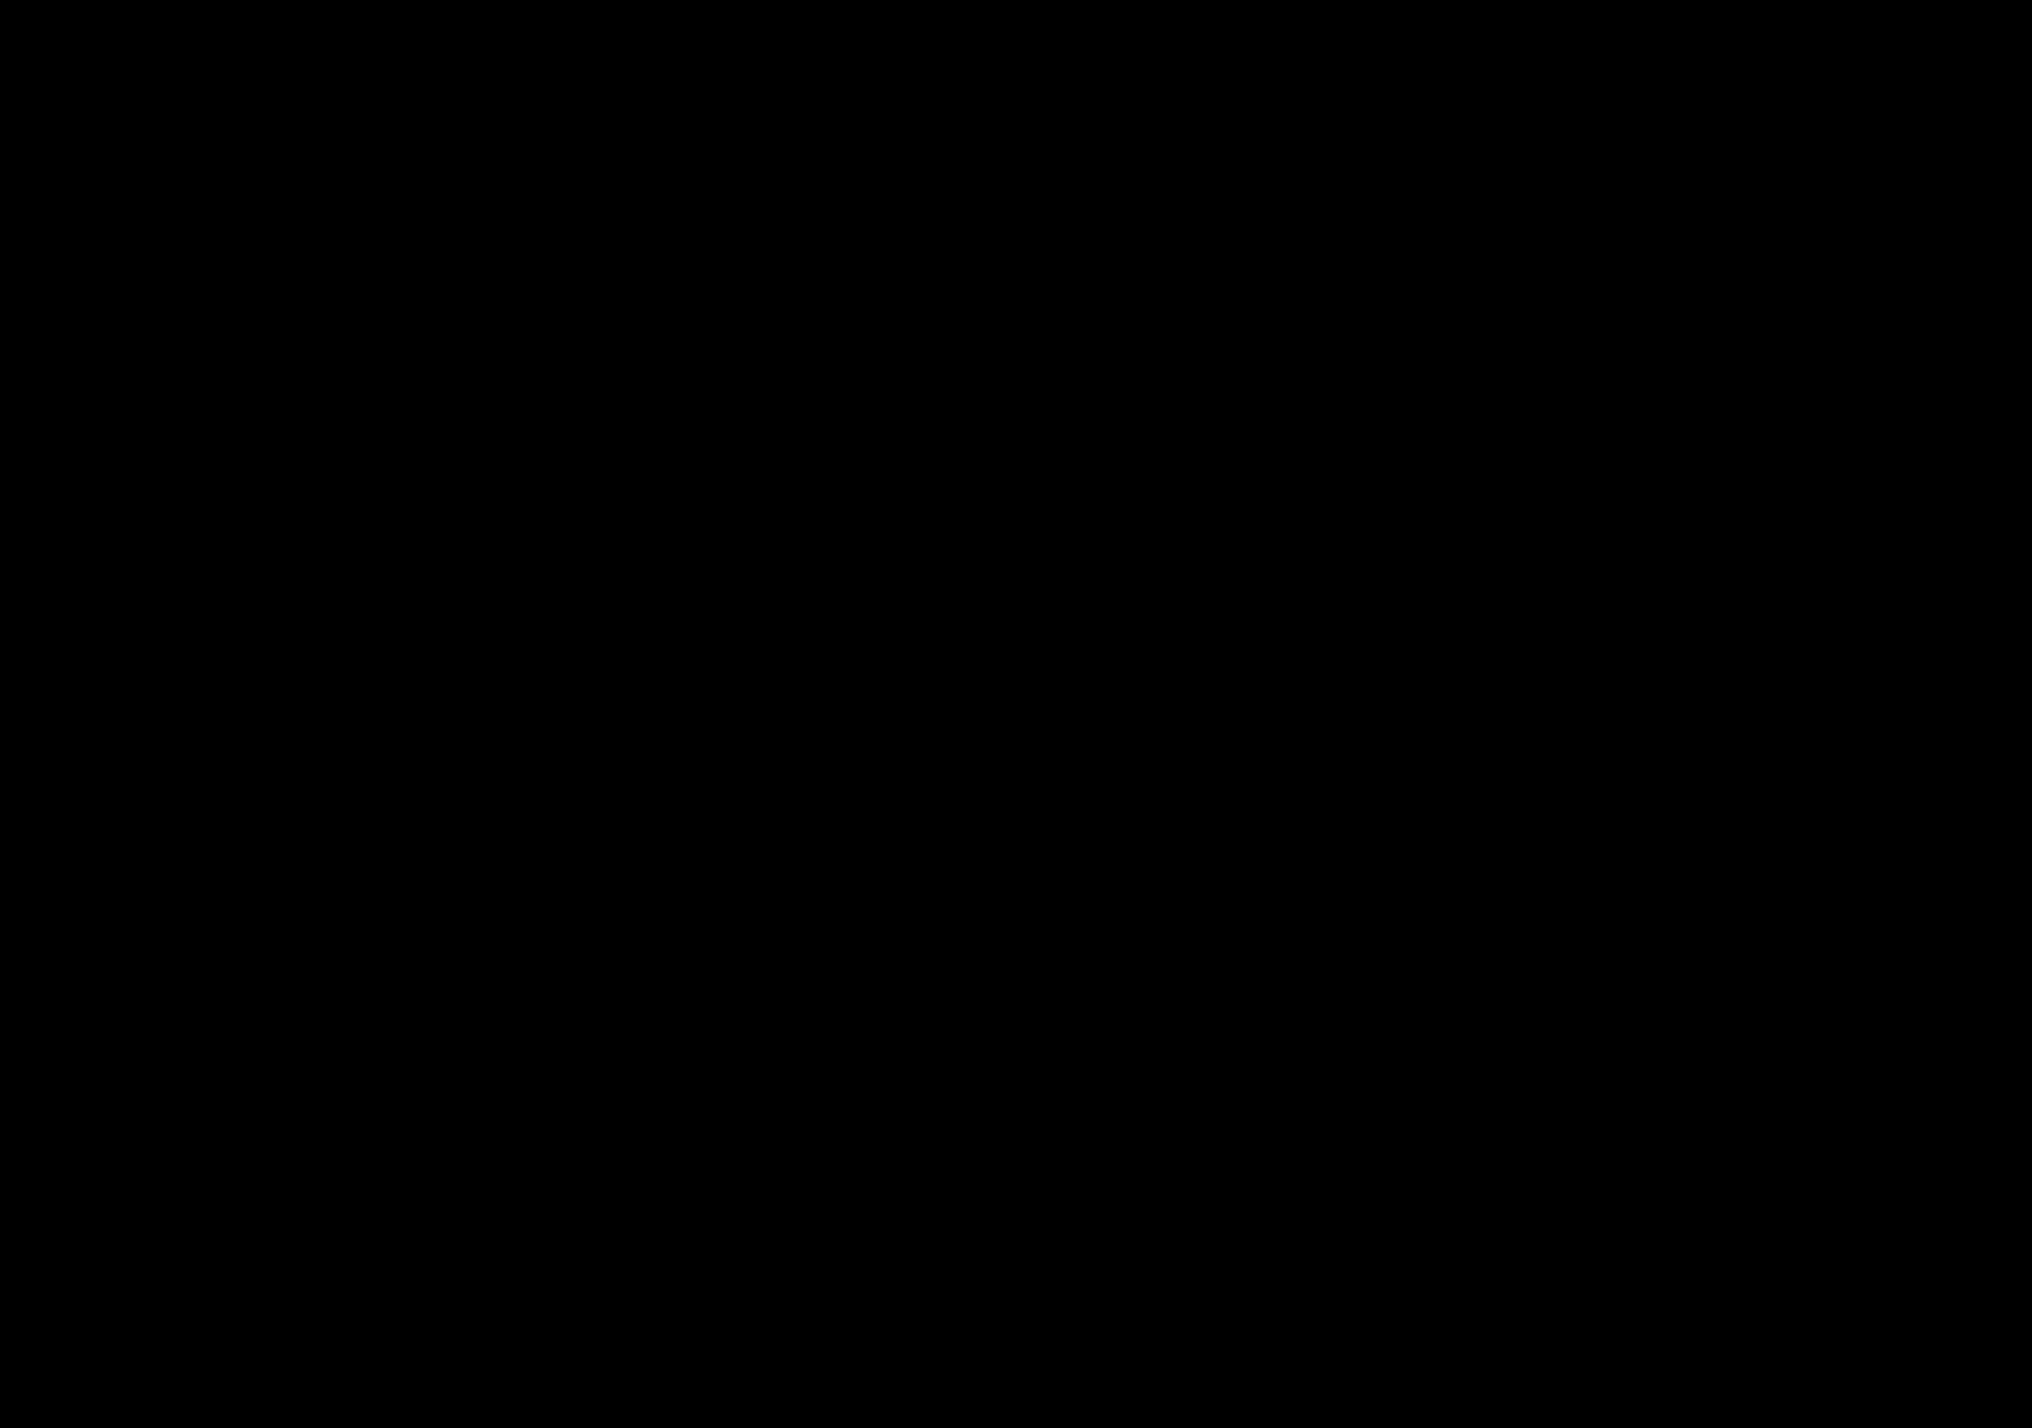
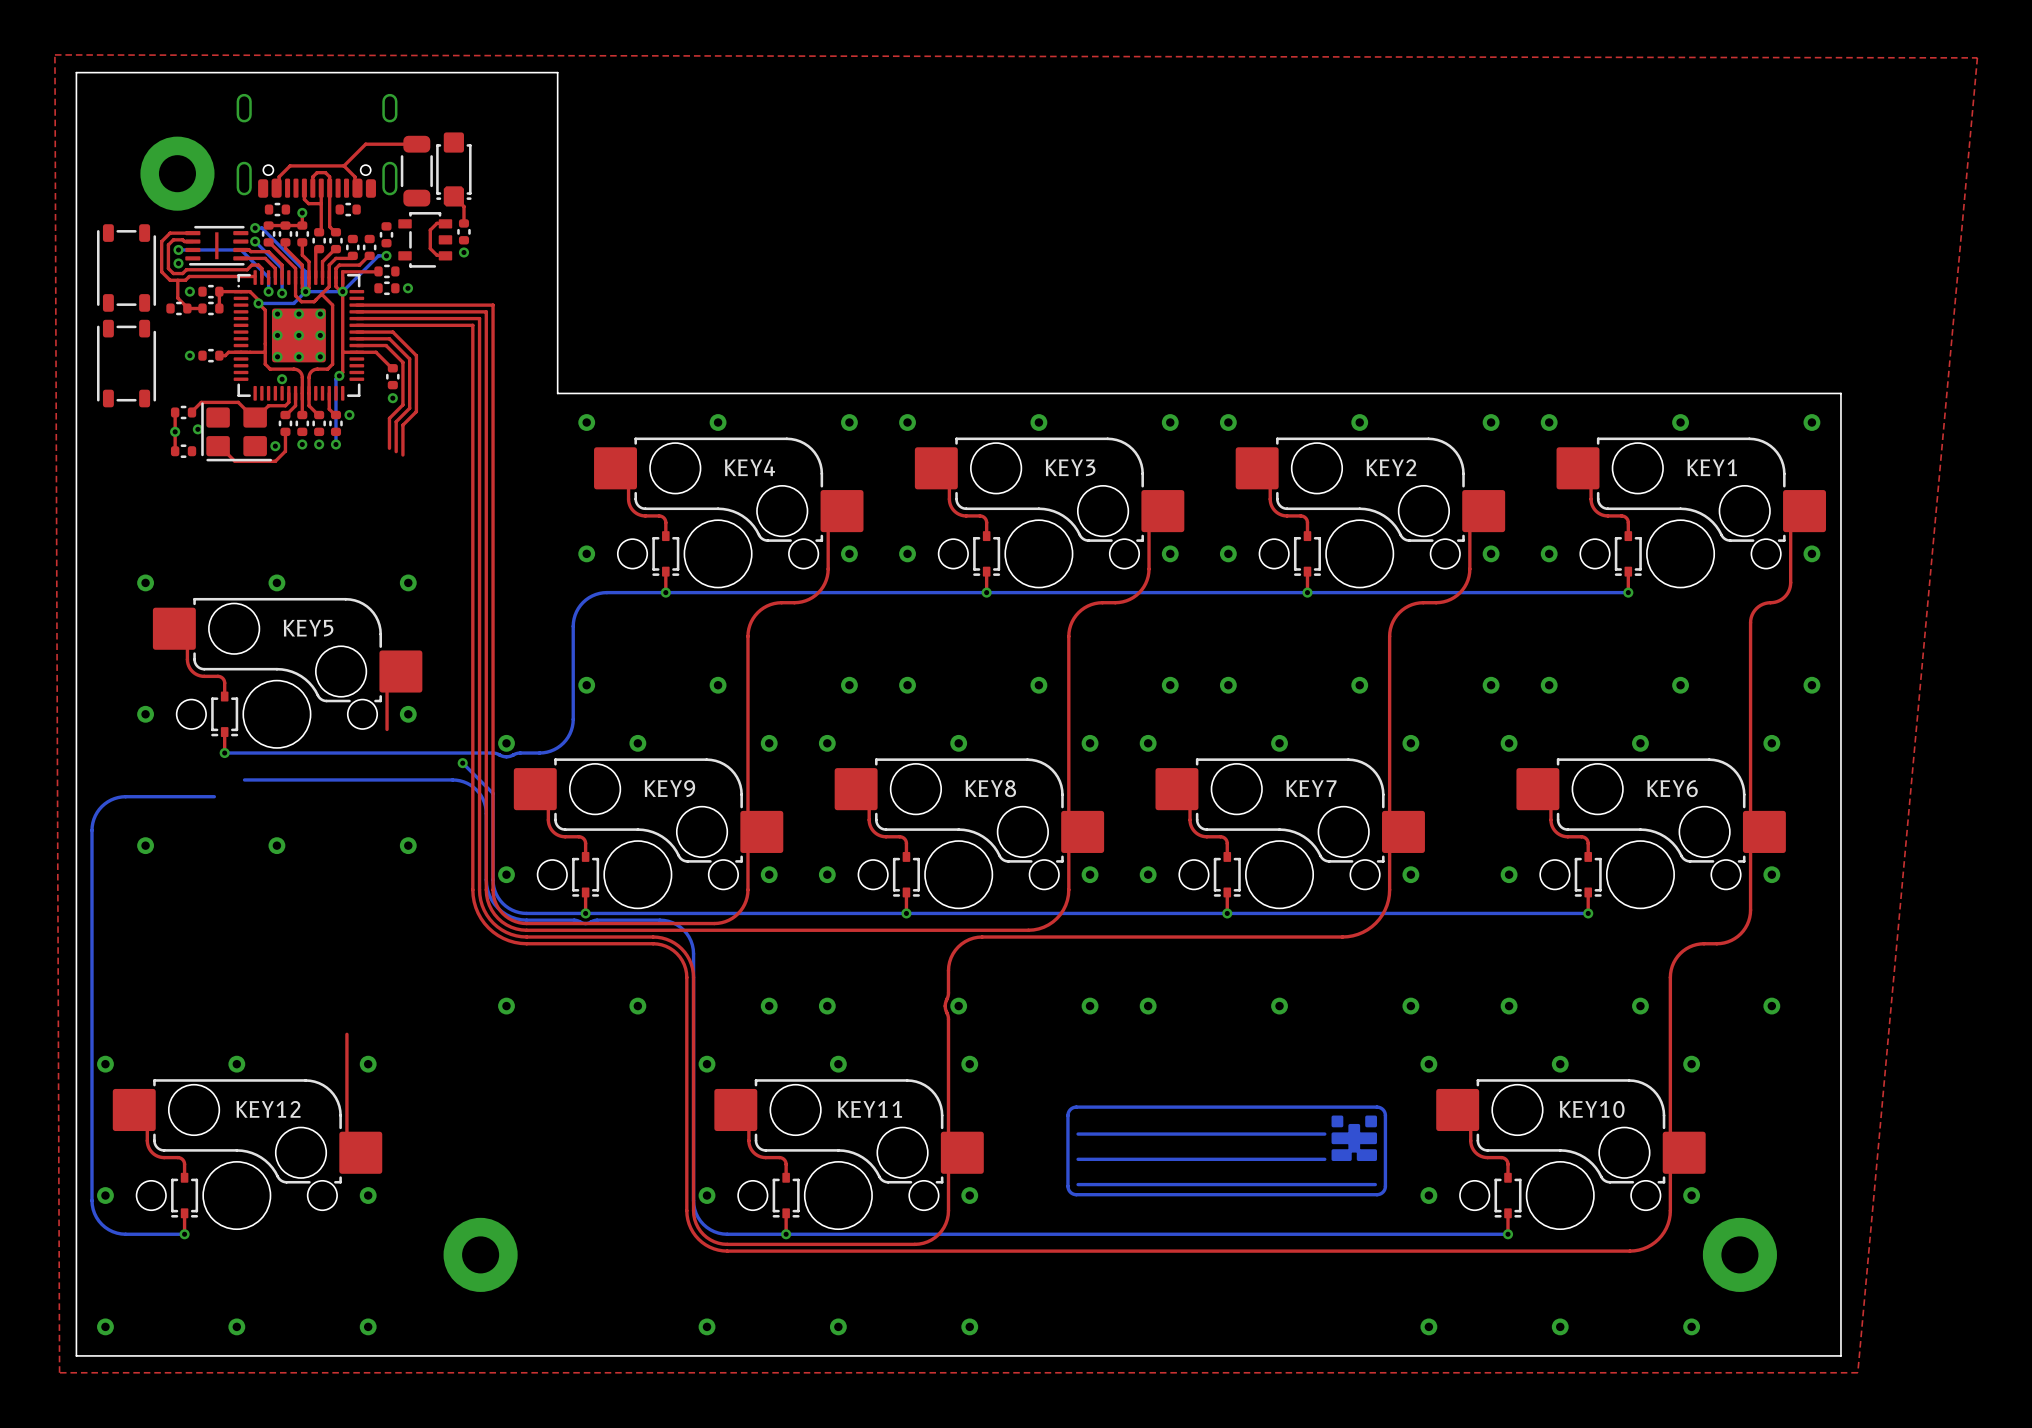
top zone outline: none -> (54, 54) (1977, 57) (1857, 1372) (59, 1372) (54, 54)
board edge: none -> (76, 72) (557, 72) (557, 393) (1840, 393) (1840, 1355) (76, 1355) (76, 72)
top track: none -> (416, 144) (365, 144) (343, 165)
part: none -> (317, 145)
top track: none -> (343, 165) (290, 165) (279, 176) (279, 188)
top track: none -> (343, 165) (354, 176) (354, 188)
part: none -> (453, 169)
part: none -> (416, 171)
part: none -> (177, 173)
top track: none -> (304, 188) (304, 199) (308, 203) (321, 203)
top track: none -> (312, 188) (312, 176) (317, 172) (325, 172) (329, 176) (329, 226) (335, 232)
top track: none -> (321, 188) (321, 232)
top track: none -> (453, 196) (463, 206) (463, 223)
part: none -> (277, 209)
part: none -> (348, 209)
top track: none -> (302, 212) (302, 225) (268, 225)
via: none -> (302, 212)
top track: none -> (445, 223) (437, 223) (430, 230) (430, 248) (437, 255) (445, 255)
bottom track: none -> (255, 228) (261, 228) (305, 271) (305, 291)
via: none -> (255, 228)
part: none -> (463, 231)
top track: none -> (191, 233) (170, 233) (161, 241) (161, 271) (170, 280) (185, 280) (189, 276) (255, 276)
part: none -> (268, 233)
part: none -> (285, 233)
part: none -> (302, 233)
part: none -> (386, 234)
part: none -> (425, 239)
part: none -> (319, 240)
part: none -> (335, 240)
top track: none -> (192, 241) (173, 239) (168, 244) (168, 268) (173, 273) (182, 273) (186, 269) (247, 269) (251, 265) (258, 265) (261, 268) (261, 277)
bottom track: none -> (255, 241) (282, 268) (282, 293)
via: none -> (255, 241)
top track: none -> (269, 242) (295, 268) (295, 295) (301, 301) (314, 301) (329, 286) (329, 265) (335, 258) (352, 258)
top track: none -> (285, 242) (285, 248) (302, 265) (302, 288) (305, 291) (309, 288) (309, 261) (302, 255) (302, 242)
part: none -> (216, 245)
part: none -> (352, 247)
part: none -> (369, 247)
bottom track: none -> (178, 249) (241, 249) (268, 277) (268, 291)
via: none -> (178, 249)
top track: none -> (240, 249) (268, 251) (282, 265) (282, 277)
top track: none -> (315, 249) (315, 277)
top track: none -> (335, 249) (322, 261) (322, 277)
via: none -> (463, 252)
top track: none -> (368, 255) (359, 265) (339, 265) (335, 268) (335, 286) (341, 291)
bottom track: none -> (386, 255) (378, 255) (342, 291) (305, 291)
via: none -> (386, 255)
top track: none -> (240, 258) (265, 258) (275, 268) (275, 277)
via: none -> (178, 263)
part: none -> (126, 267)
top track: none -> (342, 271) (378, 271)
part: none -> (386, 271)
top track: none -> (342, 277) (342, 372) (339, 375)
top track: none -> (177, 280) (177, 298) (187, 307)
part: none -> (386, 288)
via: none -> (407, 288)
via: none -> (189, 291)
part: none -> (210, 291)
via: none -> (268, 291)
bottom track: none -> (305, 291) (293, 303) (258, 303)
via: none -> (305, 291)
via: none -> (342, 291)
via: none -> (282, 293)
top track: none -> (321, 294) (332, 305) (332, 364) (327, 369) (314, 369) (309, 375) (309, 405) (318, 415)
via: none -> (258, 303)
top track: none -> (356, 305) (493, 305) (493, 889) (498, 907) (512, 920) (526, 923) (714, 923) (728, 920) (740, 910) (746, 900) (747, 889) (748, 628) (755, 615) (763, 607) (777, 602) (805, 600) (815, 595) (823, 586) (827, 572) (828, 510)
part: none -> (178, 308)
top track: none -> (187, 308) (202, 308)
part: none -> (210, 308)
top track: none -> (219, 308) (219, 291) (250, 291) (258, 300) (258, 303) (265, 310) (265, 364) (270, 369) (294, 369) (300, 372) (302, 377) (302, 415)
top track: none -> (356, 311) (486, 311) (486, 889) (487, 900) (494, 914) (506, 924) (516, 928) (1028, 930) (1048, 924) (1060, 914) (1068, 895) (1069, 628) (1073, 618) (1084, 607) (1098, 602) (1126, 600) (1136, 595) (1143, 586) (1148, 572) (1149, 510)
top track: none -> (356, 318) (479, 318) (480, 900) (484, 910) (493, 923) (506, 932) (516, 935) (657, 937) (674, 943) (687, 955) (692, 968) (693, 977) (693, 1215) (696, 1223) (703, 1234) (710, 1239) (722, 1244) (914, 1244) (927, 1241) (941, 1231) (945, 1223) (948, 1210) (948, 1019) (945, 1006) (948, 994) (948, 966) (955, 950) (969, 939) (982, 937) (1342, 937) (1358, 934) (1375, 923) (1386, 905) (1389, 889) (1390, 628) (1396, 615) (1405, 607) (1419, 602) (1447, 600) (1457, 595) (1464, 586) (1469, 572) (1469, 510)
top track: none -> (356, 325) (472, 325) (474, 901) (478, 913) (488, 927) (498, 935) (514, 942) (657, 944) (669, 948) (679, 956) (685, 968) (686, 977) (687, 1215) (690, 1228) (698, 1239) (709, 1247) (722, 1250) (1629, 1251) (1643, 1248) (1651, 1244) (1664, 1232) (1670, 1215) (1670, 977) (1672, 966) (1677, 956) (1689, 947) (1700, 943) (1724, 942) (1734, 938) (1743, 931) (1749, 917) (1750, 620) (1753, 612) (1758, 606) (1781, 599) (1789, 589) (1790, 510)
top track: none -> (356, 332) (392, 332) (416, 355) (416, 411) (402, 425) (402, 455)
part: none -> (298, 335)
top track: none -> (356, 338) (389, 338) (409, 359) (409, 408) (396, 421) (396, 451)
top track: none -> (356, 345) (386, 345) (402, 362) (402, 404) (389, 418) (389, 448)
top track: none -> (265, 352) (228, 352) (225, 355) (219, 355)
top track: none -> (342, 352) (375, 352) (392, 369)
via: none -> (189, 355)
part: none -> (210, 355)
part: none -> (126, 363)
bottom track: none -> (339, 375) (335, 379) (335, 444)
via: none -> (339, 375)
part: none -> (392, 376)
via: none -> (282, 379)
top track: none -> (288, 393) (288, 402) (285, 405) (268, 405) (256, 417)
top track: none -> (295, 393) (295, 405) (286, 415)
top track: none -> (329, 393) (329, 409) (335, 415)
via: none -> (392, 398)
top track: none -> (191, 411) (201, 402) (238, 402) (253, 417)
top track: none -> (175, 412) (175, 451)
part: none -> (183, 412)
via: none -> (349, 415)
via: none -> (586, 422)
via: none -> (718, 422)
via: none -> (849, 422)
via: none -> (907, 422)
via: none -> (1038, 422)
via: none -> (1170, 422)
via: none -> (1228, 422)
via: none -> (1359, 422)
via: none -> (1491, 422)
via: none -> (1549, 422)
via: none -> (1680, 422)
via: none -> (1811, 422)
part: none -> (285, 423)
part: none -> (302, 423)
part: none -> (319, 423)
part: none -> (335, 423)
via: none -> (197, 429)
via: none -> (175, 431)
part: none -> (236, 431)
top track: none -> (285, 431) (285, 451) (275, 461) (234, 461) (219, 446)
via: none -> (302, 444)
via: none -> (319, 444)
via: none -> (335, 444)
via: none -> (275, 446)
part: none -> (183, 451)
top track: none -> (628, 468) (630, 506) (639, 515) (663, 517) (665, 521) (665, 536)
top track: none -> (949, 468) (951, 506) (960, 515) (984, 517) (986, 521) (986, 536)
top track: none -> (1270, 468) (1271, 506) (1281, 515) (1304, 517) (1307, 521) (1307, 536)
top track: none -> (1591, 468) (1592, 506) (1602, 515) (1625, 517) (1628, 521) (1628, 536)
KEY4: none -> (728, 512)
KEY3: none -> (1049, 512)
KEY2: none -> (1370, 512)
KEY1: none -> (1691, 512)
via: none -> (586, 553)
part: none -> (665, 553)
via: none -> (849, 553)
via: none -> (907, 553)
part: none -> (986, 553)
via: none -> (1170, 553)
via: none -> (1228, 553)
part: none -> (1307, 553)
via: none -> (1491, 553)
via: none -> (1549, 553)
part: none -> (1628, 553)
via: none -> (1811, 553)
top track: none -> (665, 571) (665, 592)
top track: none -> (986, 571) (986, 592)
top track: none -> (1307, 571) (1307, 592)
top track: none -> (1628, 571) (1628, 592)
via: none -> (145, 582)
via: none -> (276, 582)
via: none -> (408, 582)
via: none -> (665, 592)
via: none -> (986, 592)
via: none -> (1307, 592)
bottom track: none -> (1628, 592) (603, 592) (592, 595) (583, 602) (574, 618) (573, 719) (569, 733) (563, 743) (550, 751) (520, 753)
via: none -> (1628, 592)
top track: none -> (187, 628) (187, 659) (189, 667) (199, 675) (222, 677) (224, 682) (224, 696)
top track: none -> (387, 670) (387, 729)
KEY5: none -> (287, 673)
via: none -> (586, 685)
via: none -> (718, 685)
via: none -> (849, 685)
via: none -> (907, 685)
via: none -> (1038, 685)
via: none -> (1170, 685)
via: none -> (1228, 685)
via: none -> (1359, 685)
via: none -> (1491, 685)
via: none -> (1549, 685)
via: none -> (1680, 685)
via: none -> (1811, 685)
via: none -> (145, 714)
part: none -> (224, 714)
via: none -> (408, 714)
top track: none -> (224, 732) (224, 753)
via: none -> (506, 743)
via: none -> (637, 743)
via: none -> (769, 743)
via: none -> (827, 743)
via: none -> (958, 743)
via: none -> (1090, 743)
via: none -> (1148, 743)
via: none -> (1279, 743)
via: none -> (1410, 743)
via: none -> (1509, 743)
via: none -> (1640, 743)
via: none -> (1771, 743)
bottom track: none -> (224, 753) (492, 753) (506, 756) (520, 753)
via: none -> (224, 753)
bottom track: none -> (462, 763) (493, 793) (493, 879) (494, 890) (505, 906) (522, 913) (1588, 913)
via: none -> (462, 763)
bottom track: none -> (244, 779) (452, 779) (463, 781) (476, 789) (484, 802) (486, 813) (486, 885) (491, 899) (502, 911) (521, 919) (574, 920) (585, 923) (597, 920) (664, 920) (676, 924) (683, 930) (690, 940) (693, 953) (693, 1204) (700, 1221) (714, 1231) (727, 1234) (1508, 1234)
top track: none -> (548, 789) (550, 827) (559, 835) (583, 838) (585, 842) (585, 856)
top track: none -> (869, 789) (870, 827) (880, 835) (903, 838) (906, 842) (906, 856)
top track: none -> (1190, 789) (1191, 827) (1201, 835) (1224, 838) (1227, 842) (1227, 856)
top track: none -> (1550, 789) (1550, 819) (1553, 828) (1563, 836) (1585, 838) (1588, 842) (1588, 856)
bottom track: none -> (214, 796) (118, 797) (101, 806) (95, 815) (92, 826) (93, 1209) (101, 1224) (116, 1233) (181, 1234)
KEY9: none -> (648, 833)
KEY8: none -> (969, 833)
KEY7: none -> (1290, 833)
KEY6: none -> (1651, 833)
via: none -> (145, 845)
via: none -> (276, 845)
via: none -> (408, 845)
via: none -> (506, 874)
part: none -> (585, 874)
via: none -> (769, 874)
via: none -> (827, 874)
part: none -> (906, 874)
via: none -> (1090, 874)
via: none -> (1148, 874)
part: none -> (1227, 874)
via: none -> (1410, 874)
via: none -> (1509, 874)
part: none -> (1588, 874)
via: none -> (1771, 874)
top track: none -> (585, 892) (585, 913)
top track: none -> (906, 892) (906, 913)
top track: none -> (1227, 892) (1227, 913)
top track: none -> (1588, 892) (1588, 913)
via: none -> (585, 913)
via: none -> (906, 913)
via: none -> (1227, 913)
via: none -> (1588, 913)
via: none -> (506, 1006)
via: none -> (637, 1006)
via: none -> (769, 1006)
via: none -> (827, 1006)
via: none -> (958, 1006)
via: none -> (1090, 1006)
via: none -> (1148, 1006)
via: none -> (1279, 1006)
via: none -> (1410, 1006)
via: none -> (1509, 1006)
via: none -> (1640, 1006)
via: none -> (1771, 1006)
top track: none -> (346, 1034) (346, 1152)
via: none -> (105, 1064)
via: none -> (236, 1064)
via: none -> (368, 1064)
via: none -> (707, 1064)
via: none -> (838, 1064)
via: none -> (969, 1064)
via: none -> (1428, 1064)
via: none -> (1560, 1064)
via: none -> (1691, 1064)
bottom track: none -> (1076, 1107) (1379, 1107) (1385, 1114) (1385, 1188) (1382, 1192) (1376, 1194) (1074, 1194) (1068, 1187) (1067, 1115) (1070, 1109) (1076, 1107)
top track: none -> (147, 1109) (147, 1140) (149, 1149) (159, 1157) (181, 1158) (184, 1163) (184, 1177)
top track: none -> (748, 1109) (748, 1140) (751, 1149) (761, 1157) (783, 1158) (786, 1163) (786, 1177)
top track: none -> (1470, 1109) (1470, 1140) (1473, 1149) (1483, 1157) (1505, 1158) (1507, 1163) (1508, 1177)
drawing: none -> [1331, 1115, 1377, 1162]
bottom track: none -> (1078, 1134) (1324, 1134)
KEY12: none -> (247, 1154)
KEY11: none -> (849, 1154)
KEY10: none -> (1570, 1154)
bottom track: none -> (1078, 1159) (1324, 1159)
bottom track: none -> (1078, 1184) (1375, 1184)
via: none -> (105, 1195)
part: none -> (184, 1195)
via: none -> (368, 1195)
via: none -> (707, 1195)
part: none -> (786, 1195)
via: none -> (969, 1195)
via: none -> (1428, 1195)
part: none -> (1508, 1195)
via: none -> (1691, 1195)
top track: none -> (184, 1213) (184, 1234)
top track: none -> (786, 1213) (786, 1234)
top track: none -> (1508, 1213) (1508, 1234)
via: none -> (184, 1234)
via: none -> (786, 1234)
via: none -> (1508, 1234)
part: none -> (480, 1254)
part: none -> (1739, 1254)
via: none -> (105, 1326)
via: none -> (236, 1326)
via: none -> (368, 1326)
via: none -> (707, 1326)
via: none -> (838, 1326)
via: none -> (969, 1326)
via: none -> (1428, 1326)
via: none -> (1560, 1326)
via: none -> (1691, 1326)

